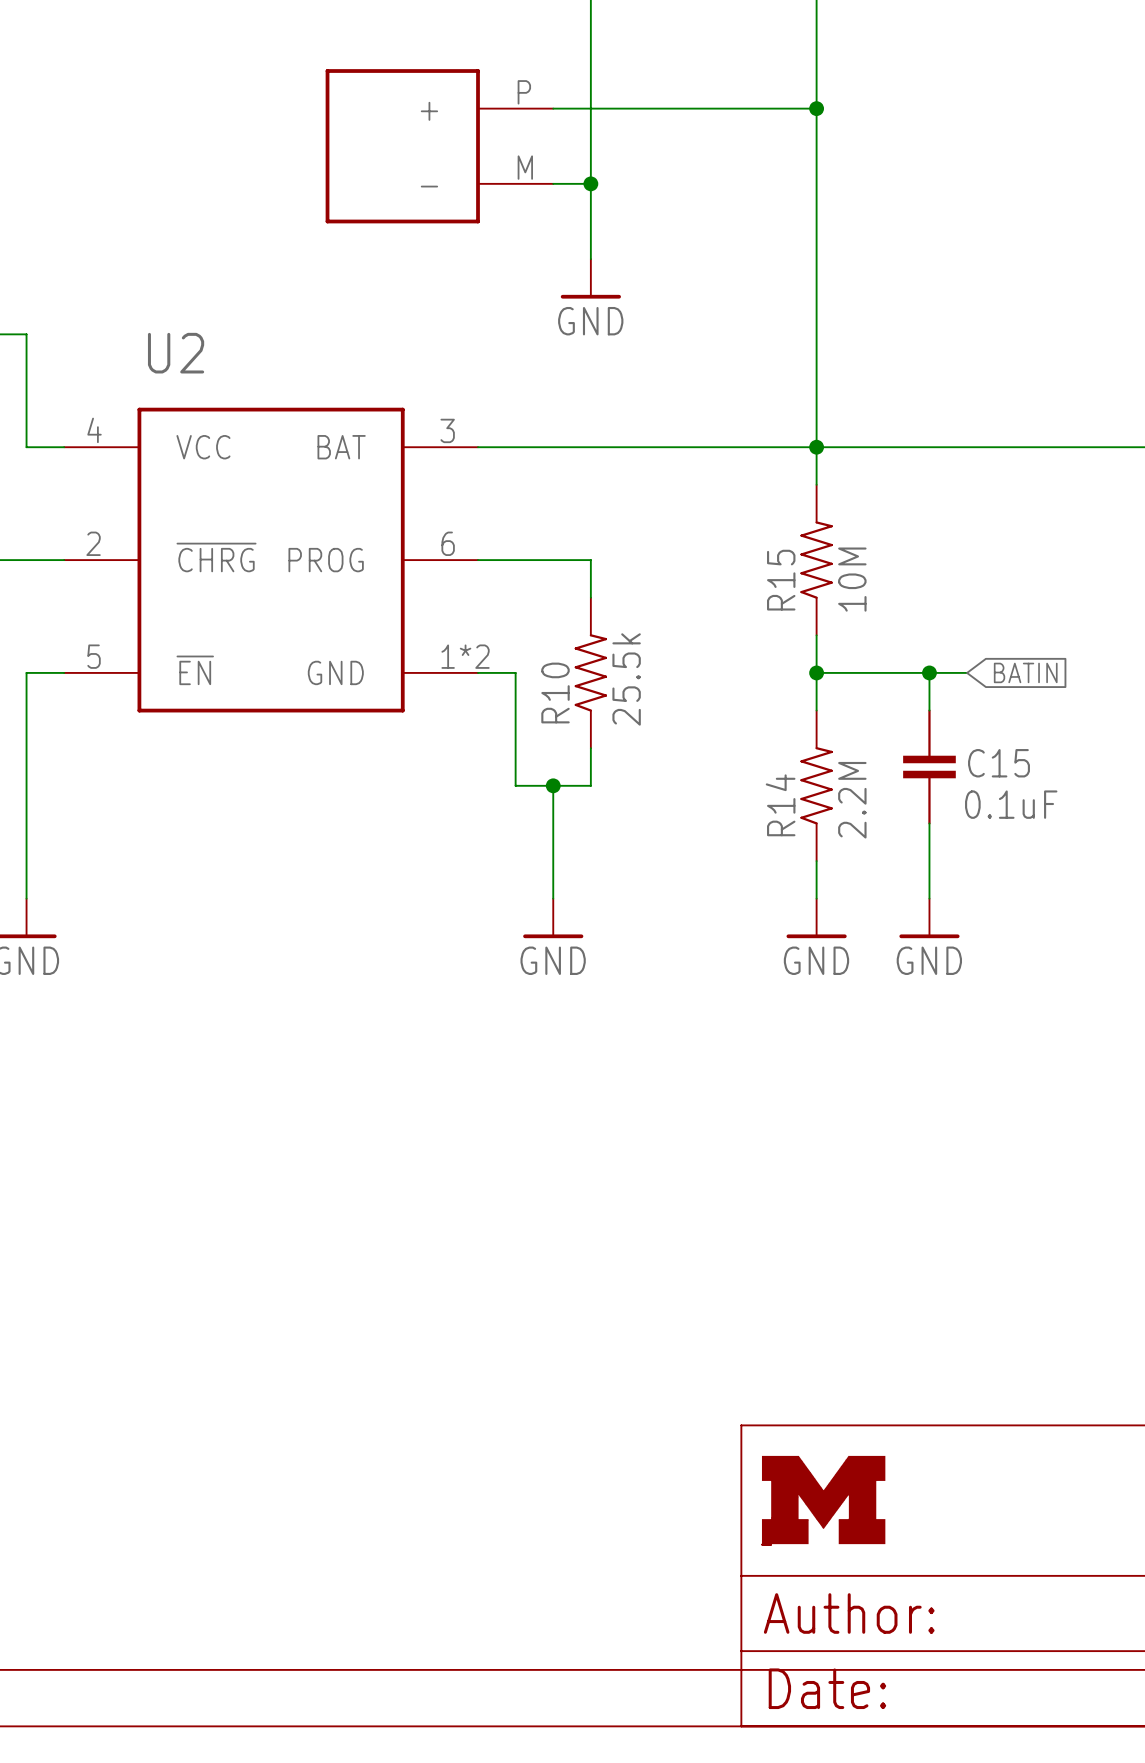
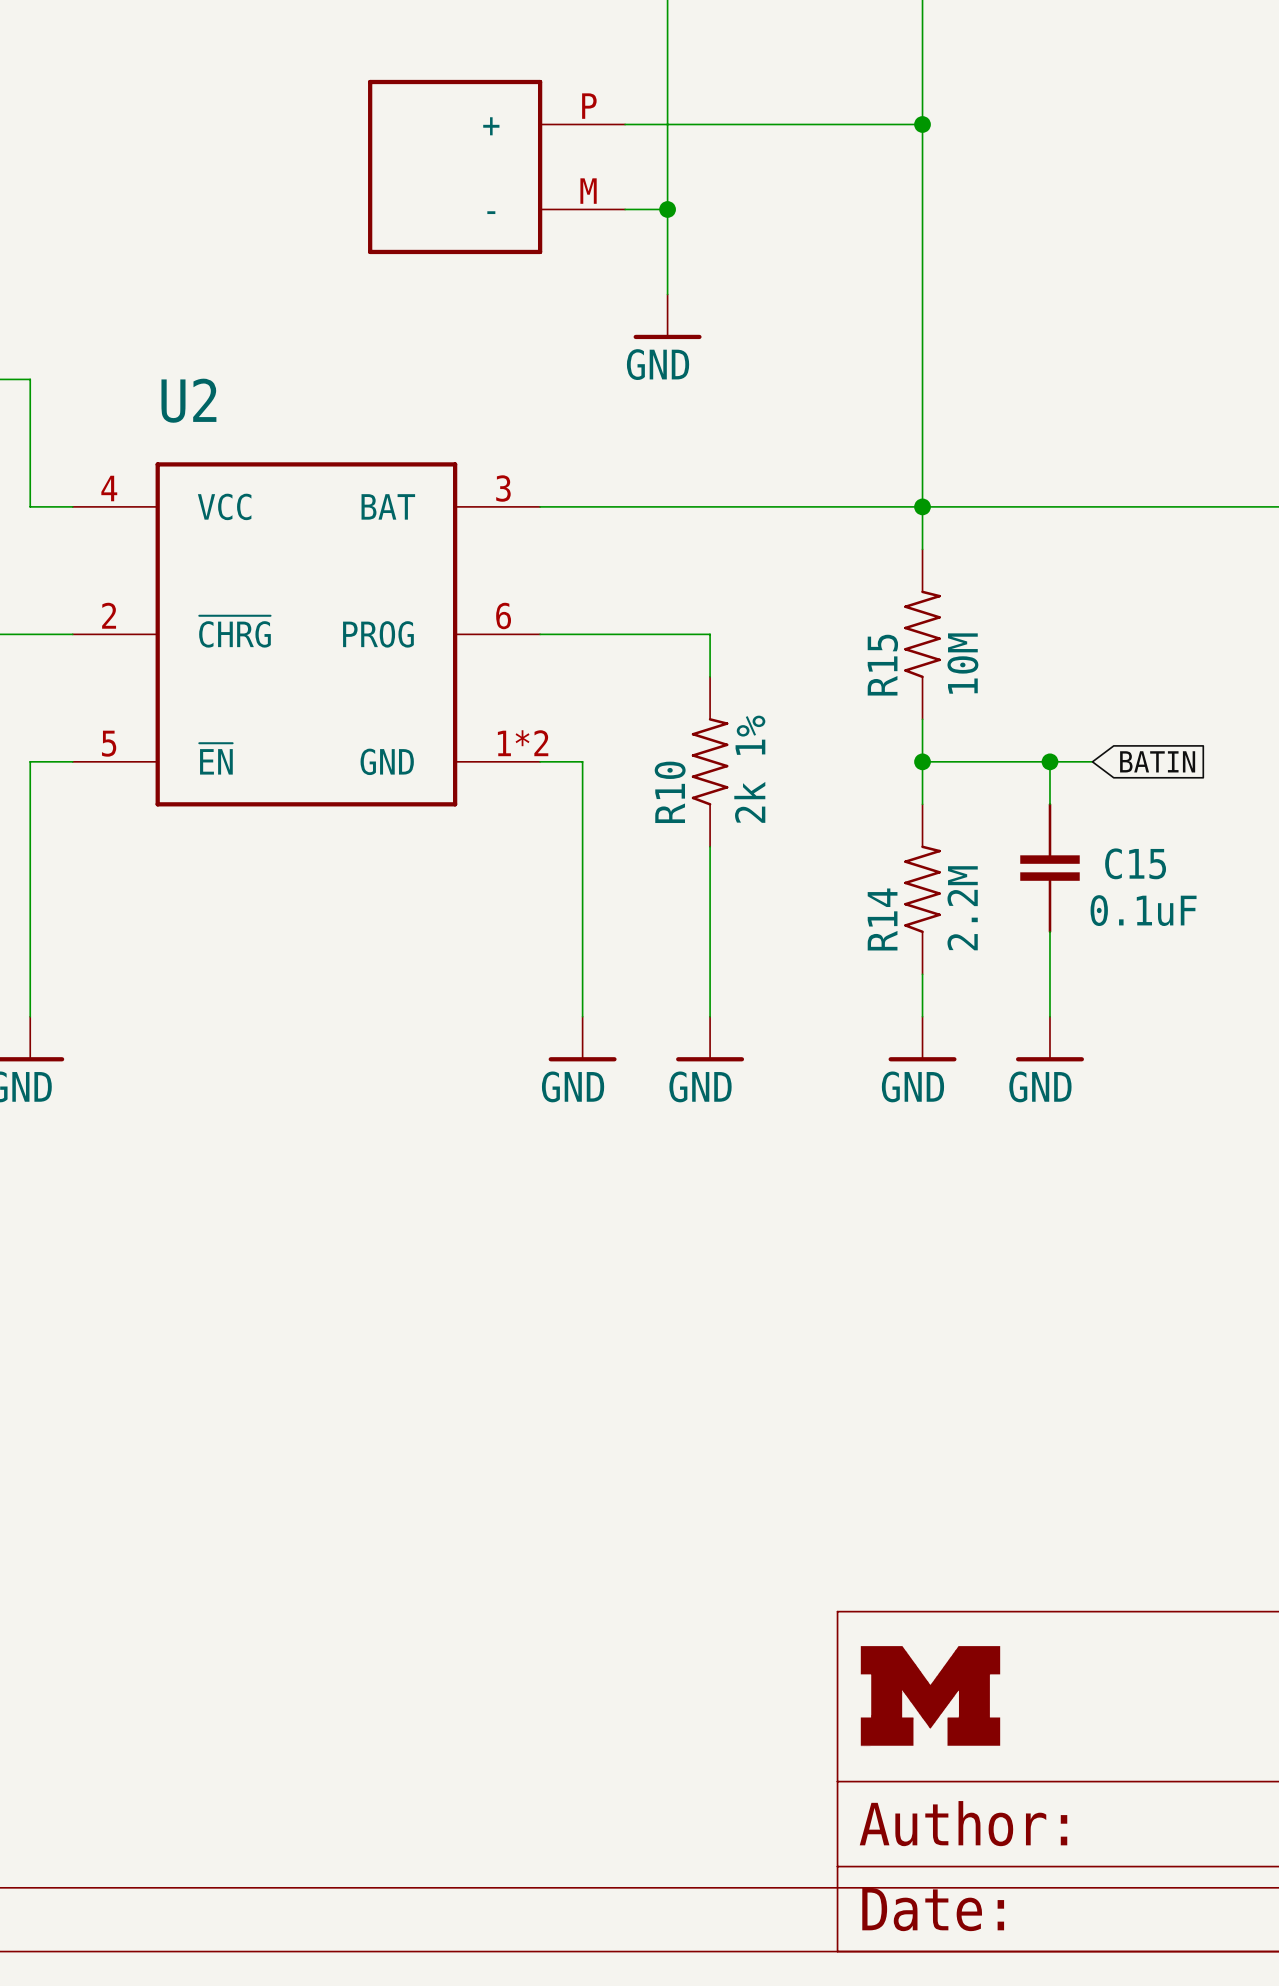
wire: (590, 560) (590, 597) -> (667, 634) (710, 634) (710, 676)
R10 position: (590, 672) -> (710, 761)
R10 value: 25.5k (626, 679) -> 2k 1% (749, 769)
wire: (590, 748) (590, 785) (515, 785) -> (582, 1016) (582, 889)
wire: none -> (710, 846) (710, 1016)
wire: (553, 785) (553, 898) -> none
junction: (553, 785) -> none
power symbol: none -> GND (582, 1039)
power symbol: GND (553, 918) -> none
power symbol: none -> GND (710, 1039)

